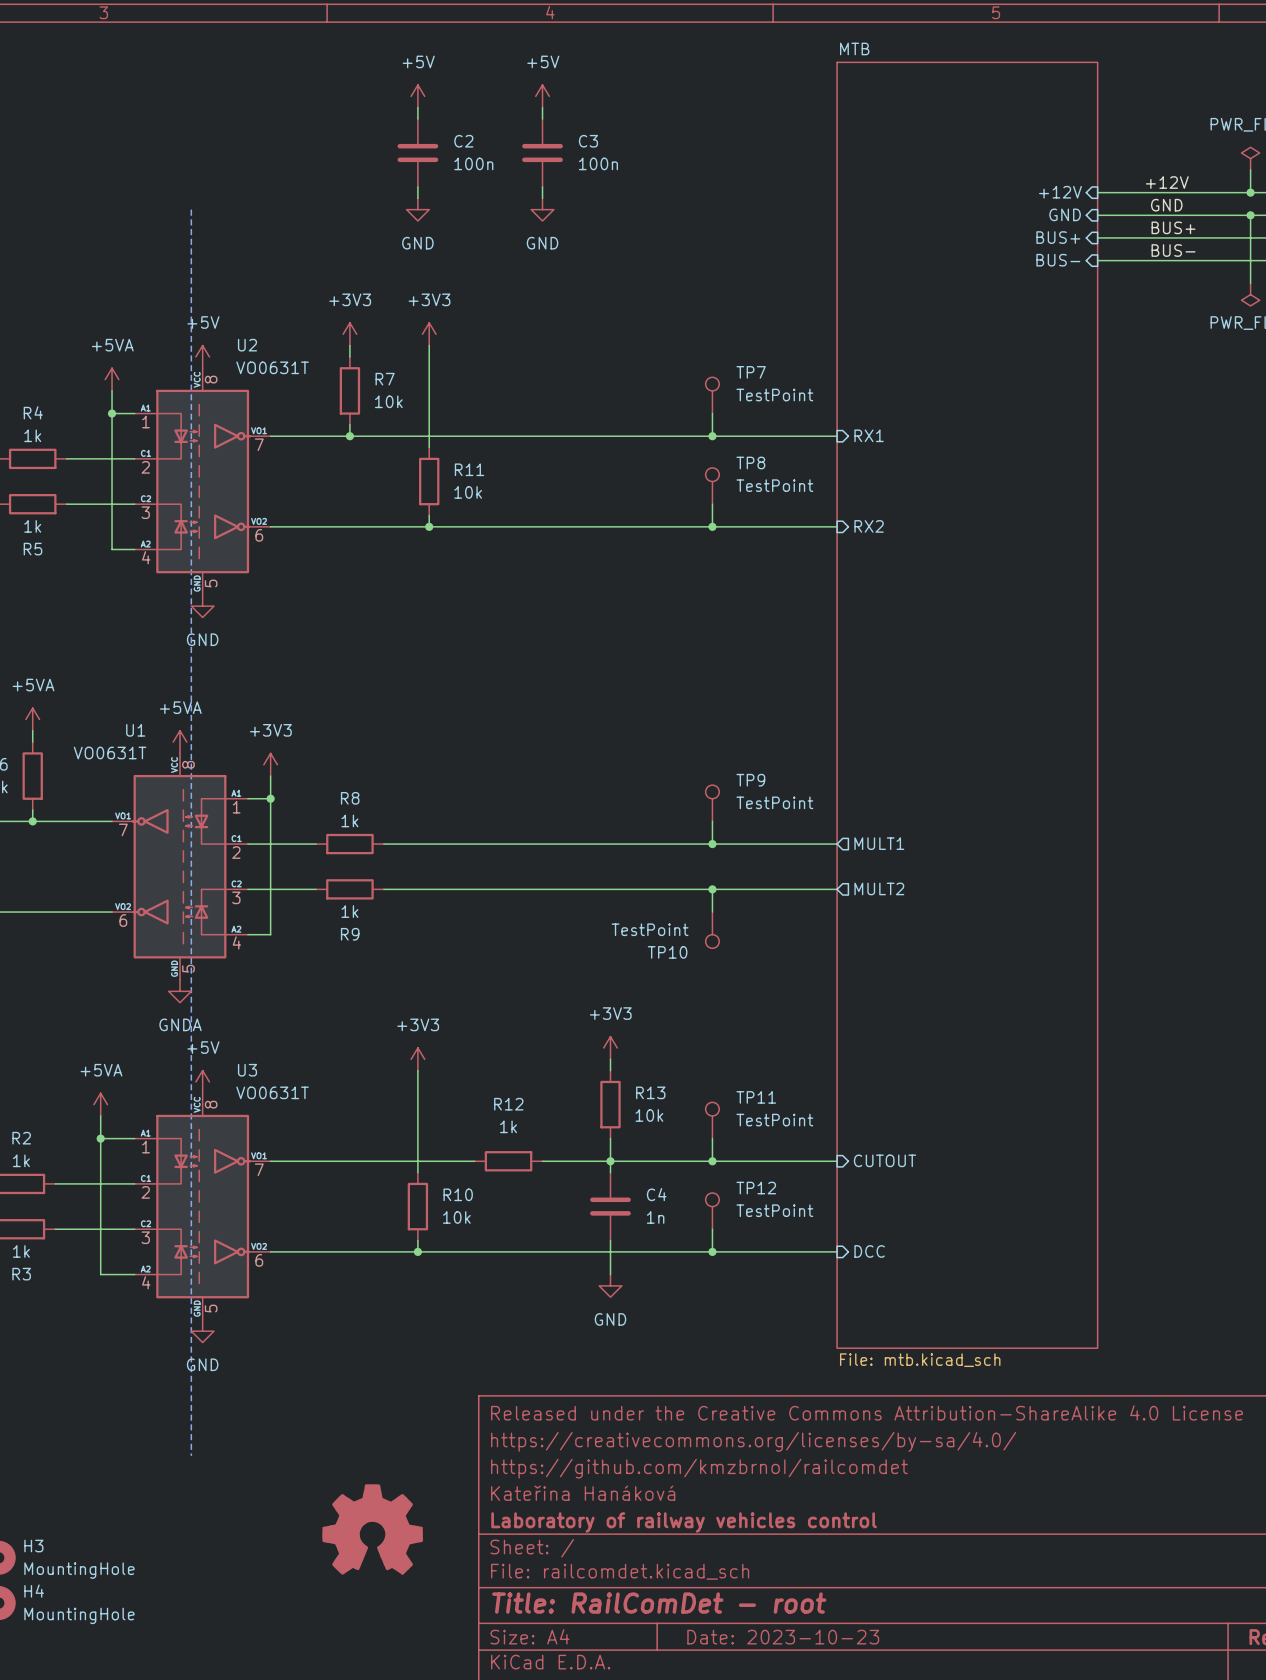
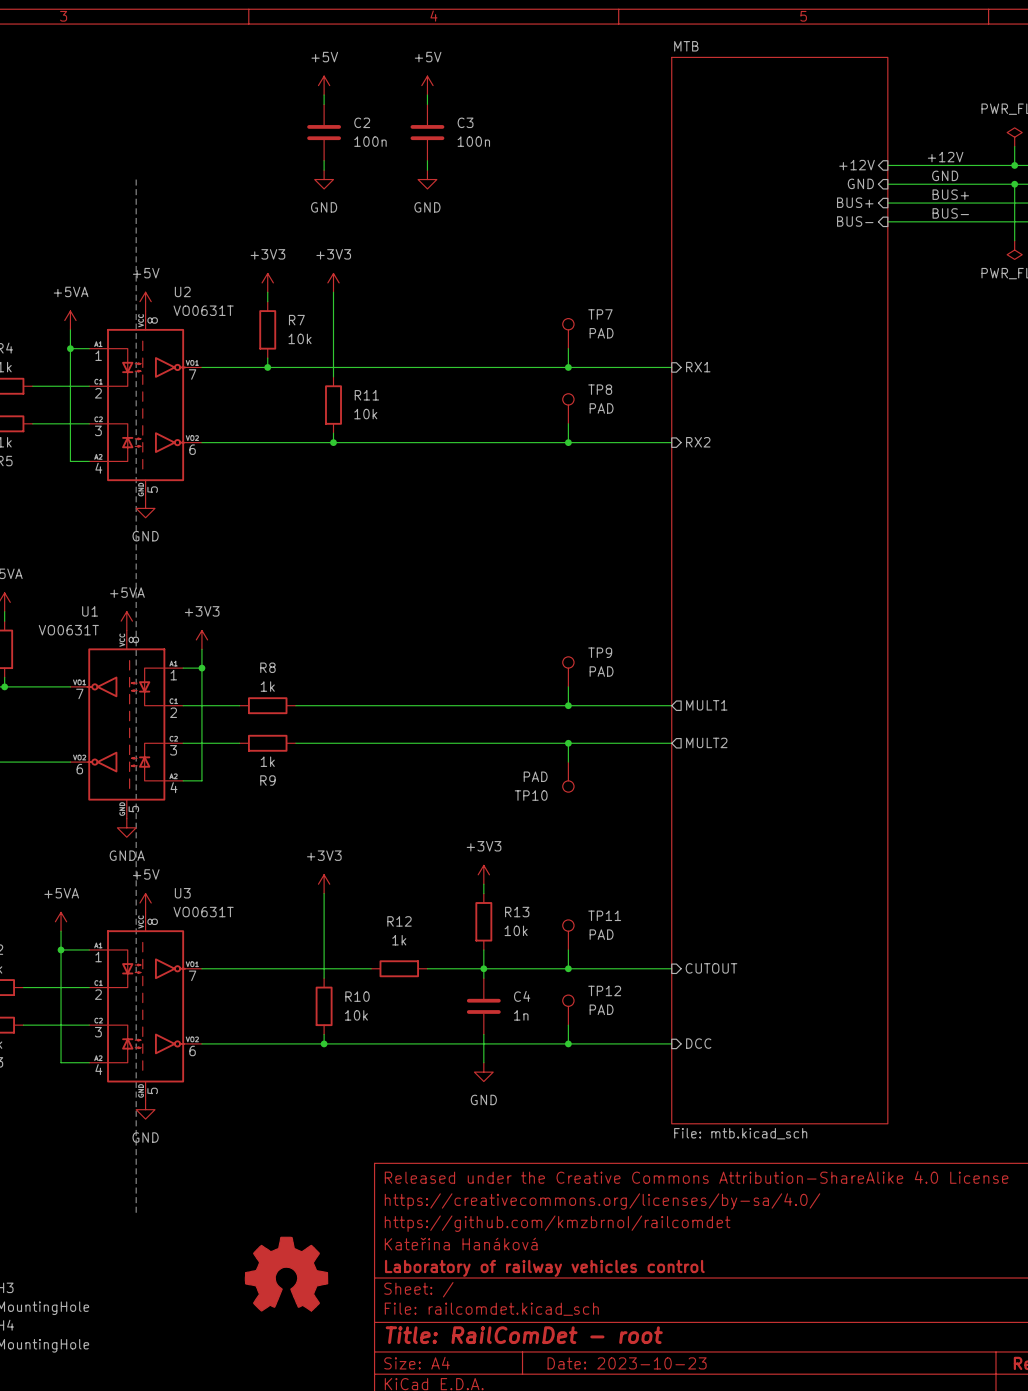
TP7 value: TestPoint (774, 395) -> PAD (601, 333)
TP8 value: TestPoint (774, 485) -> PAD (601, 408)
TP9 value: TestPoint (774, 802) -> PAD (601, 671)
TP10 value: TestPoint (650, 929) -> PAD (535, 776)
TP11 value: TestPoint (774, 1120) -> PAD (601, 934)
TP12 value: TestPoint (774, 1210) -> PAD (601, 1009)

